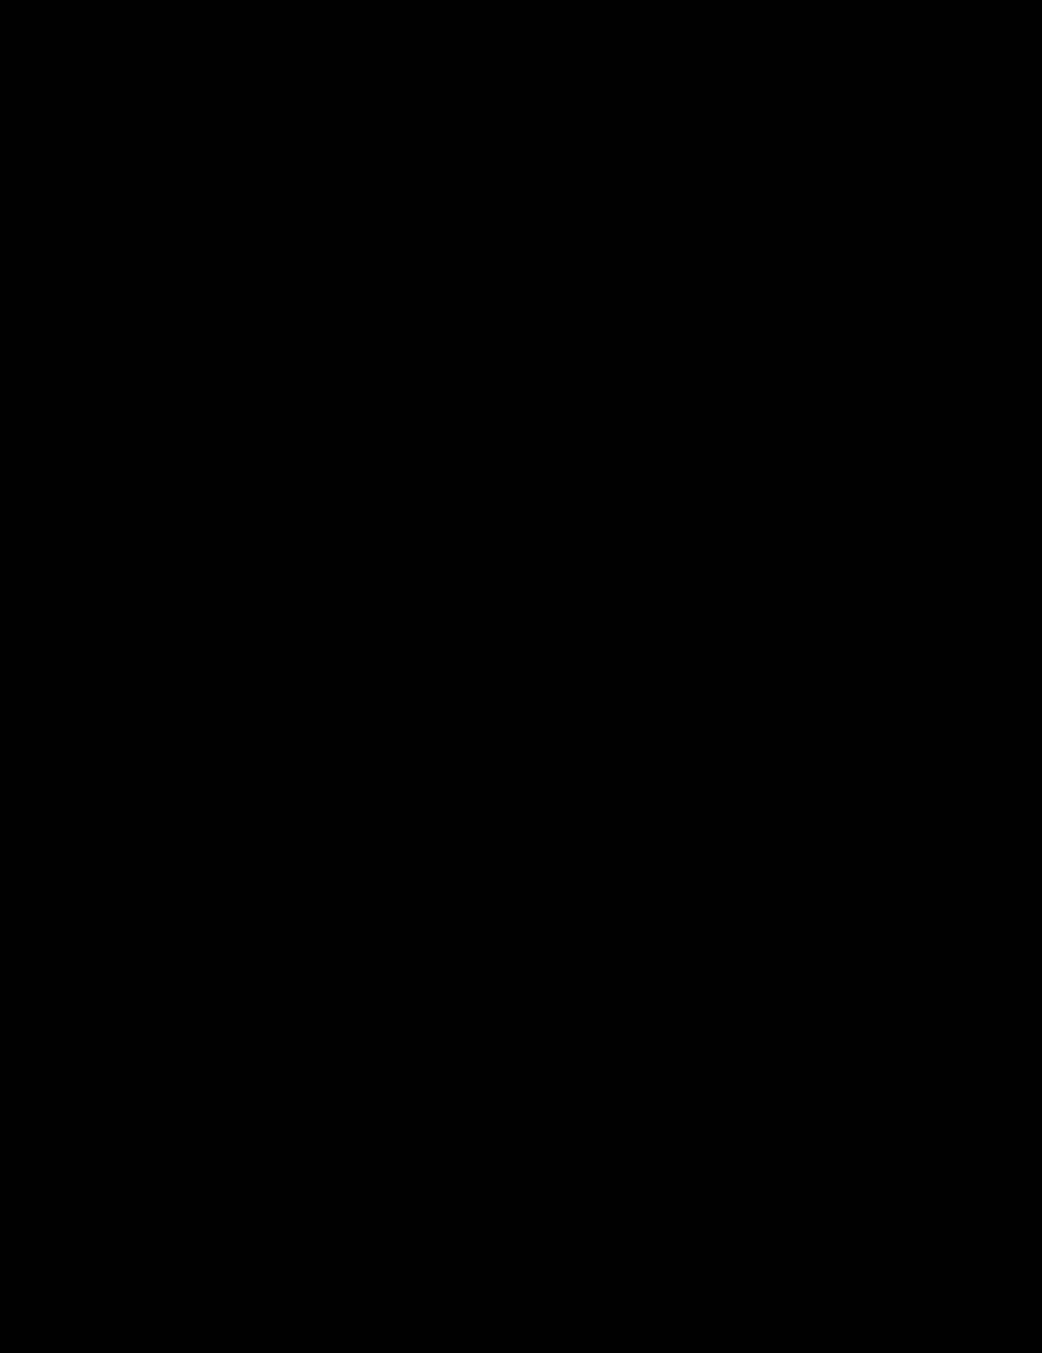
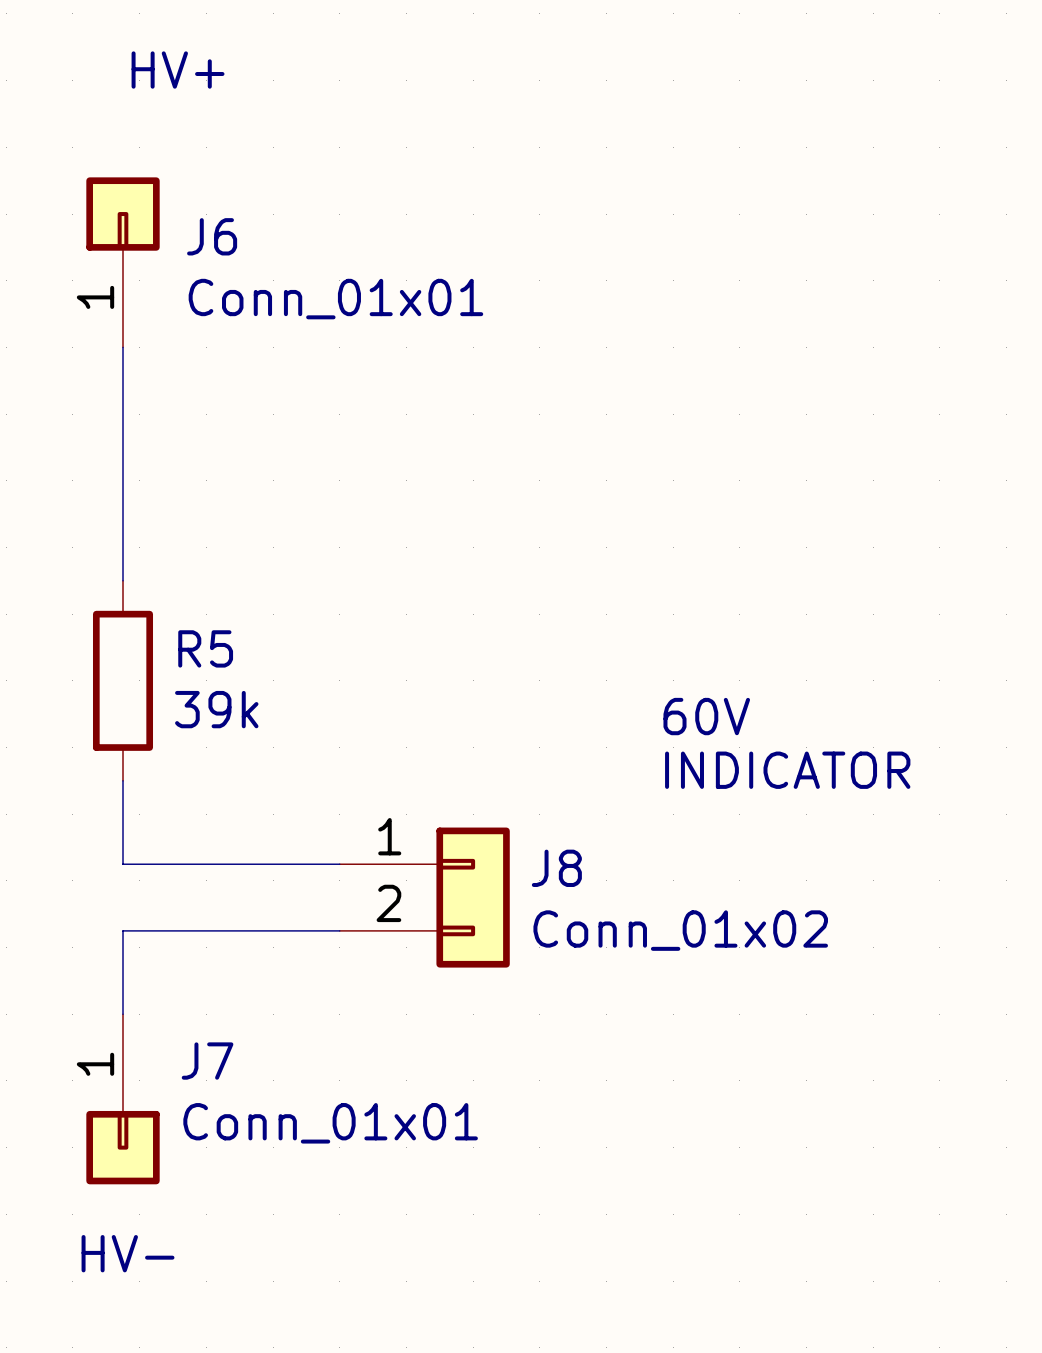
text: none -> HV+ (178, 70)
J6: none -> Conn_01x01 (123, 262)
wire: none -> (123, 347) (123, 580)
R5: none -> 39k (123, 680)
text: none -> 60V (706, 716)
text: none -> INDICATOR (787, 770)
wire: none -> (123, 780) (123, 864) (339, 864)
J8: none -> Conn_01x02 (424, 897)
wire: none -> (339, 930) (123, 930) (123, 1014)
J7: none -> Conn_01x01 (123, 1099)
text: none -> HV- (128, 1253)

